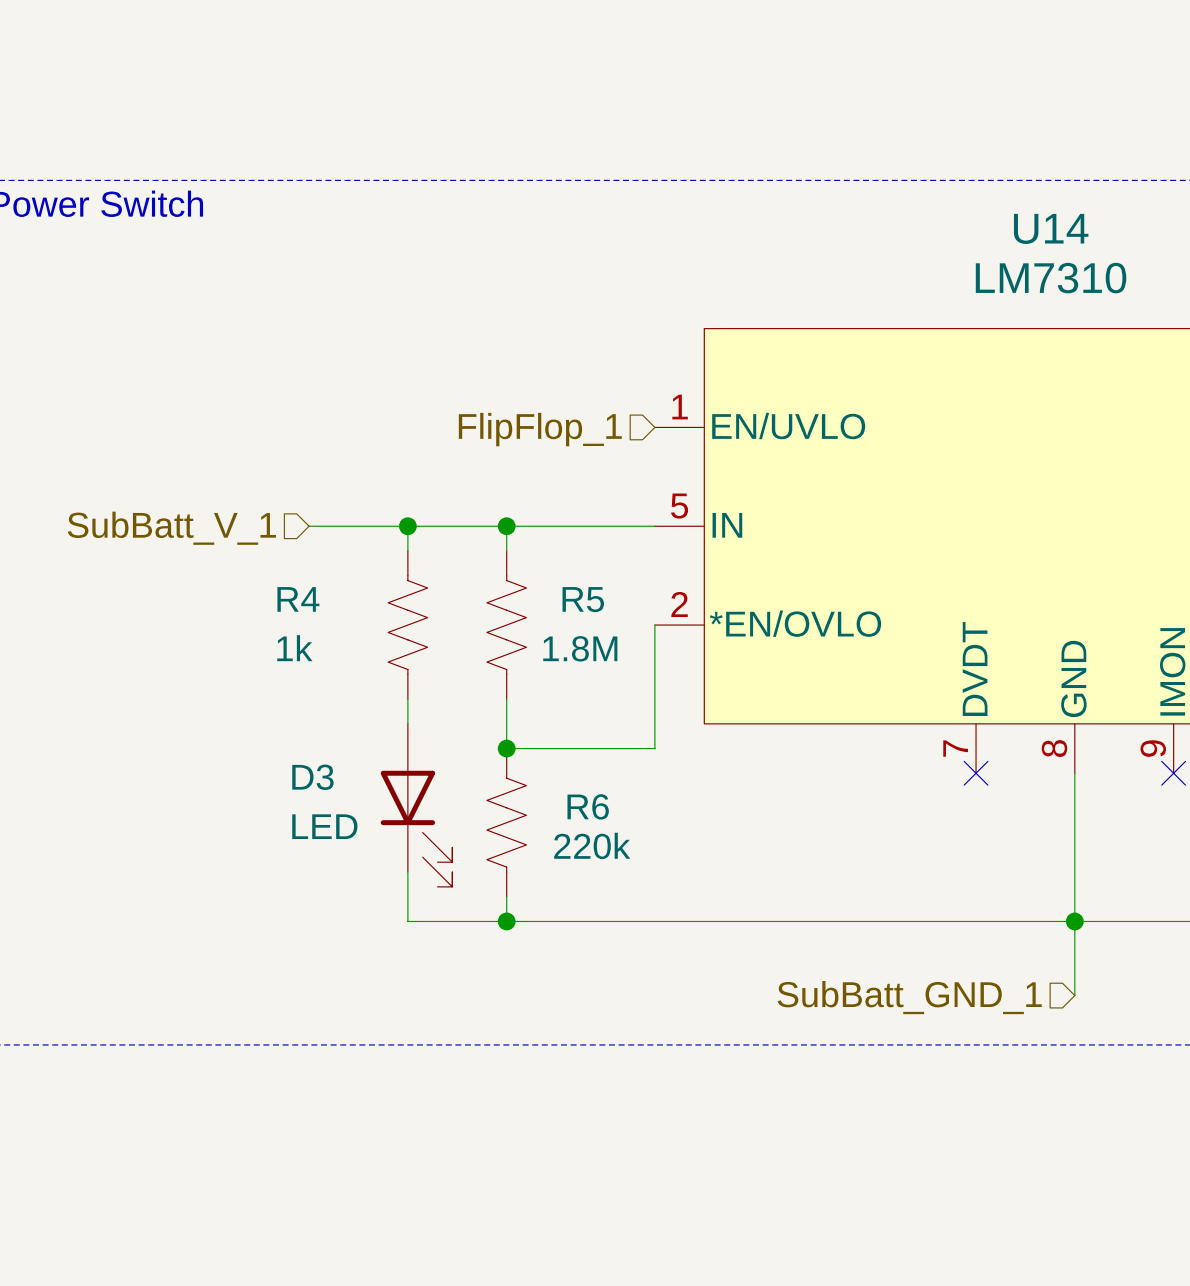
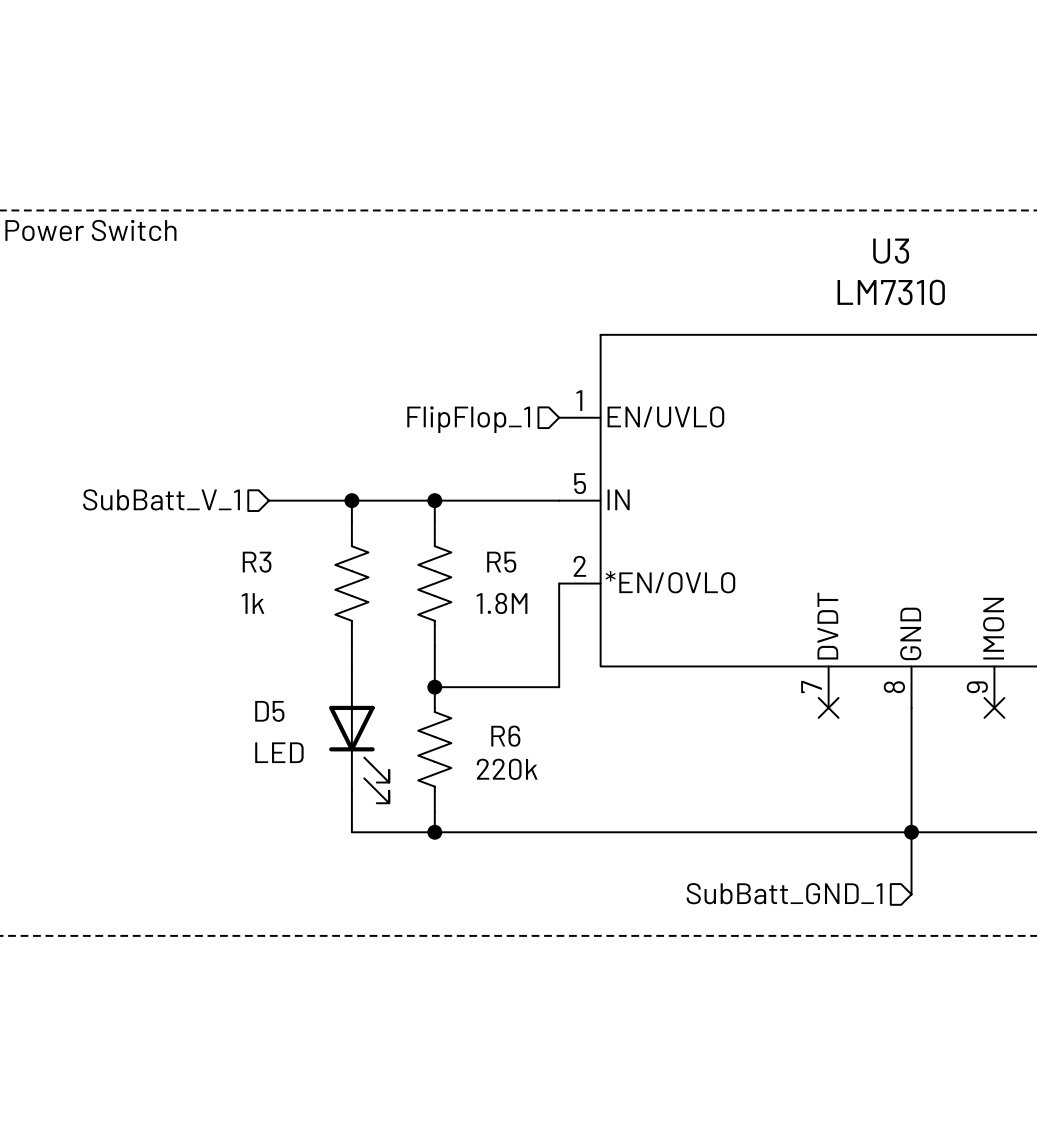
U14 name: U14 (1051, 228) -> U3 (891, 251)
R4 name: R4 (298, 599) -> R3 (257, 562)
D3 name: D3 (312, 777) -> D5 (269, 711)

